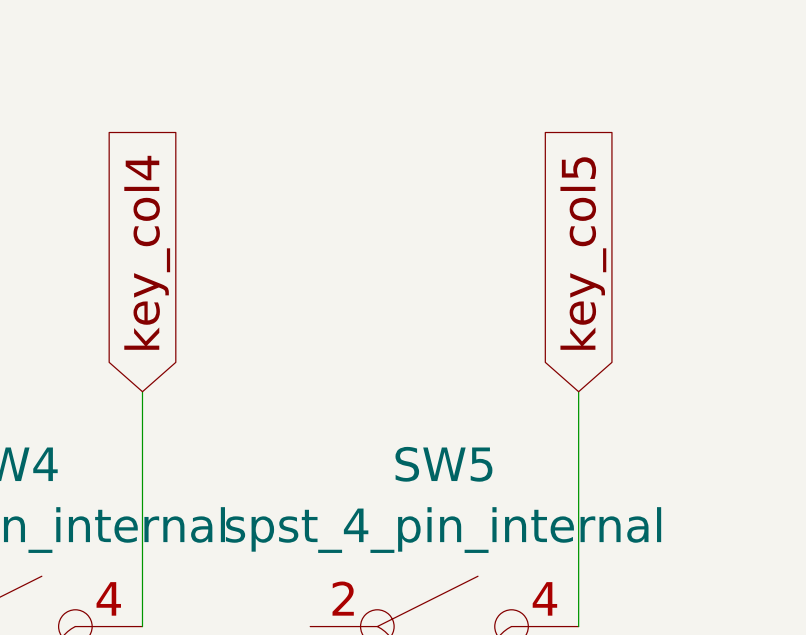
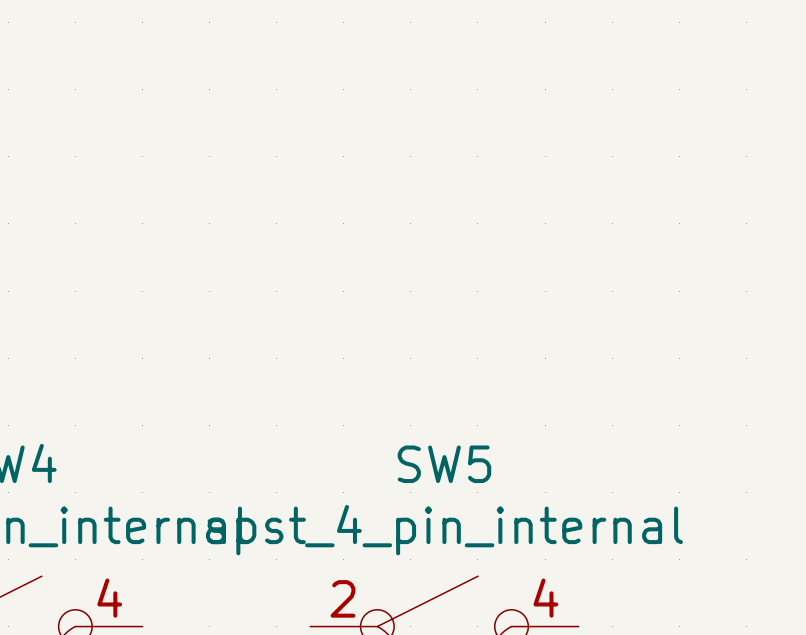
global label: key_col4 (147, 252) -> none
global label: key_col5 (583, 253) -> none
wire: (142, 391) (142, 626) -> none
wire: (578, 391) (578, 626) -> none

